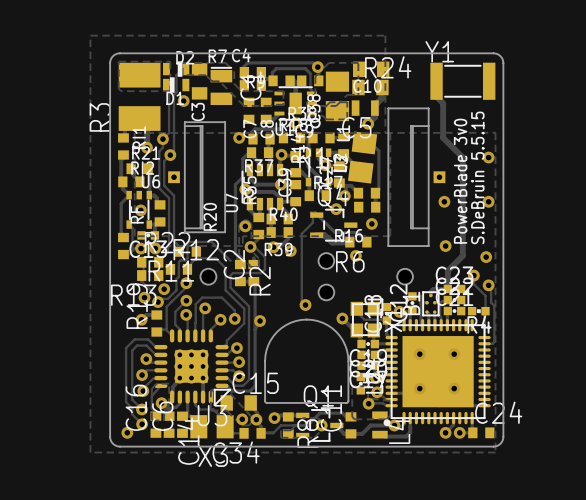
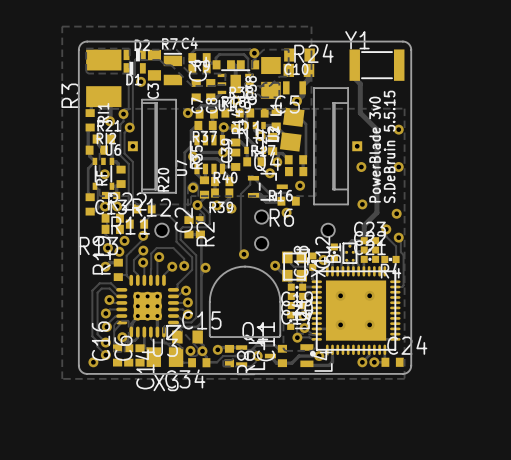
track: (230, 260) (211, 241) (189, 241) (187, 258) (178, 262) (176, 290) (167, 298) (159, 298) -> none

